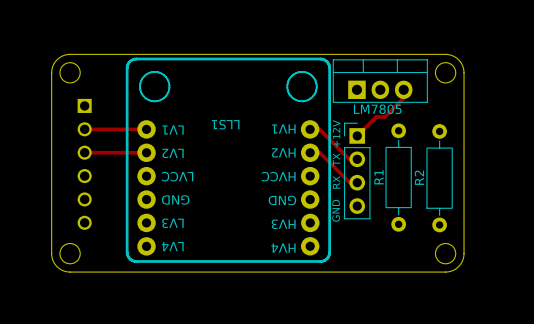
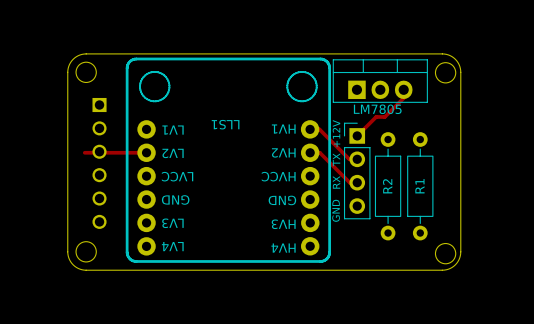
board edge: (70, 54) (445, 54) (453, 56) (461, 63) (464, 72) (464, 253) (462, 261) (455, 269) (445, 272) (70, 272) (62, 270) (54, 263) (51, 253) (51, 72) (57, 59) (70, 54) -> (86, 53) (73, 59) (67, 72) (67, 251) (69, 259) (76, 267) (86, 270) (442, 270) (452, 267) (457, 261) (460, 251) (460, 72) (458, 64) (452, 56) (442, 53) (86, 53)
round board edge position: (70, 72) -> (86, 72)
top track: (84, 129) (146, 129) -> none
part position: (84, 164) -> (99, 163)
R1 name position: R1 (378, 177) -> R1 (419, 186)
R1 position: (398, 177) -> (388, 186)
R2 name position: R2 (419, 177) -> R2 (387, 186)
R2 position: (439, 178) -> (420, 186)
round board edge position: (70, 253) -> (86, 251)

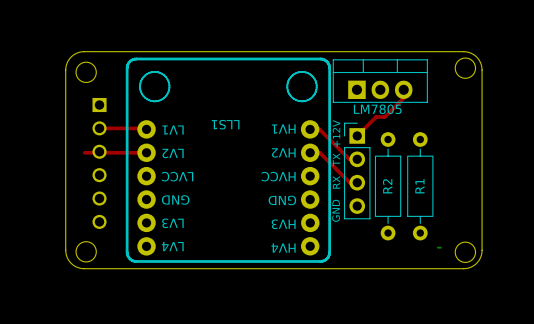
board edge: (86, 53) (442, 53) (452, 56) (458, 64) (460, 72) (460, 251) (457, 261) (452, 267) (442, 270) (86, 270) (76, 267) (69, 259) (67, 251) (67, 72) (73, 59) (86, 53) -> (84, 51) (71, 57) (65, 70) (65, 250) (68, 259) (74, 266) (84, 268) (463, 268) (473, 265) (480, 258) (482, 250) (482, 70) (479, 60) (471, 53) (463, 51) (84, 51)
round board edge position: (445, 72) -> (465, 68)
top track: none -> (99, 128) (145, 128)
bottom track: none -> (437, 247) (440, 247)
round board edge position: (445, 253) -> (465, 252)

